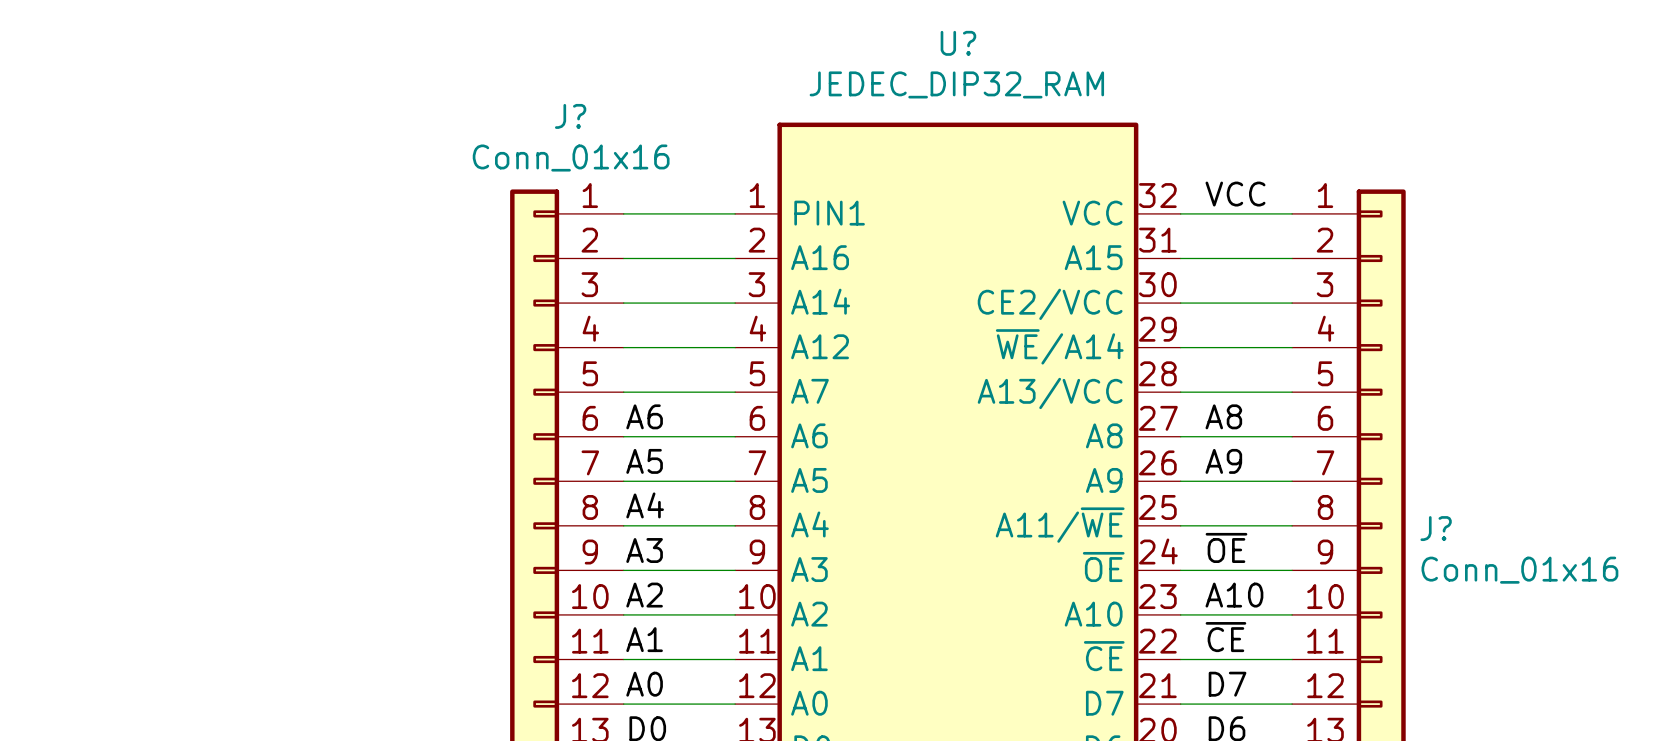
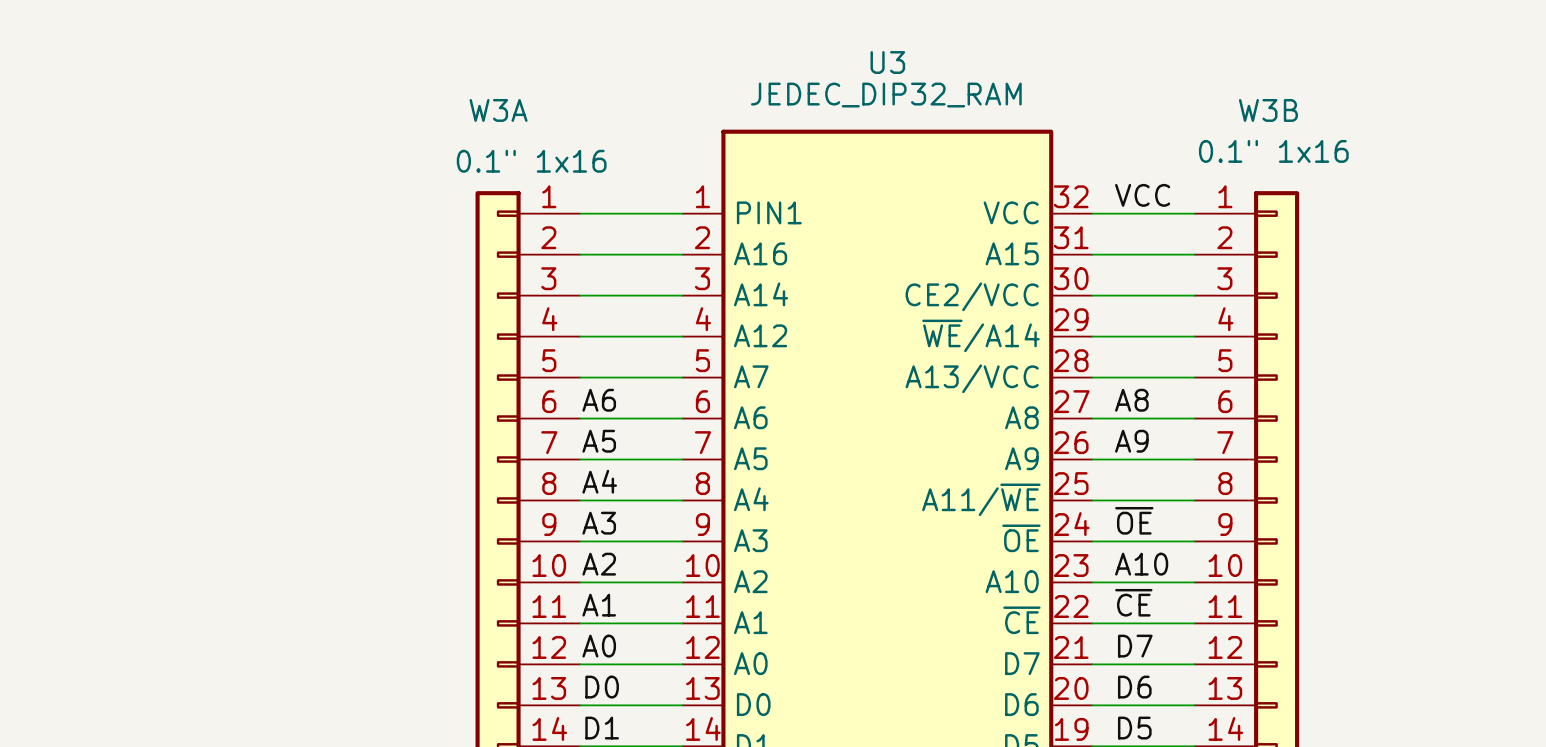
U? name: U? (958, 43) -> U3 (887, 62)
J? name: J? (570, 116) -> W3A (498, 110)
J? value: Conn_01x16 (571, 158) -> 0.1" 1x16 (531, 161)
J? name: J? (1436, 528) -> W3B (1268, 110)
J? value: Conn_01x16 (1519, 570) -> 0.1" 1x16 (1273, 151)

